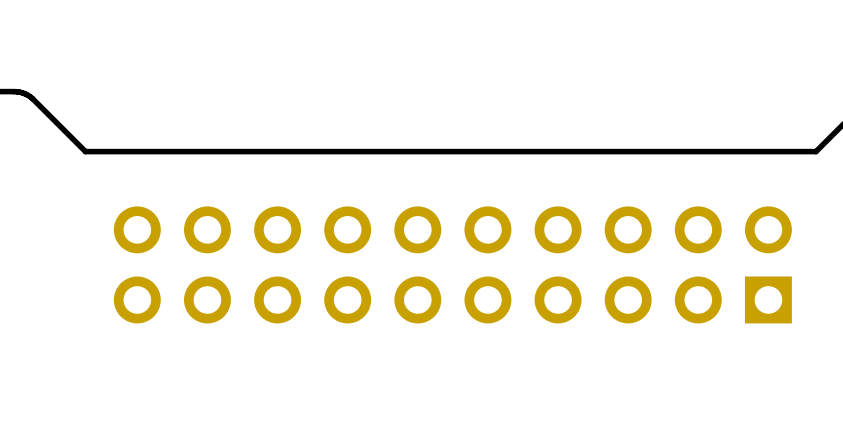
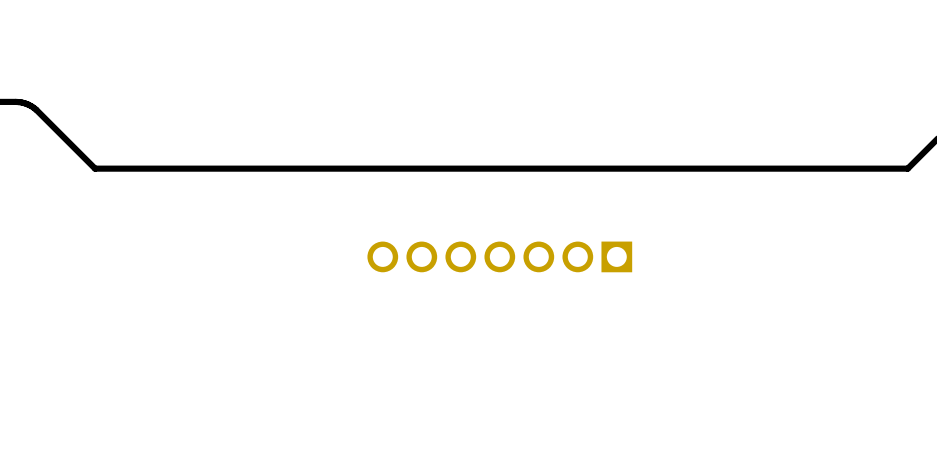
part: none -> (499, 256)
part: (452, 264) -> none

